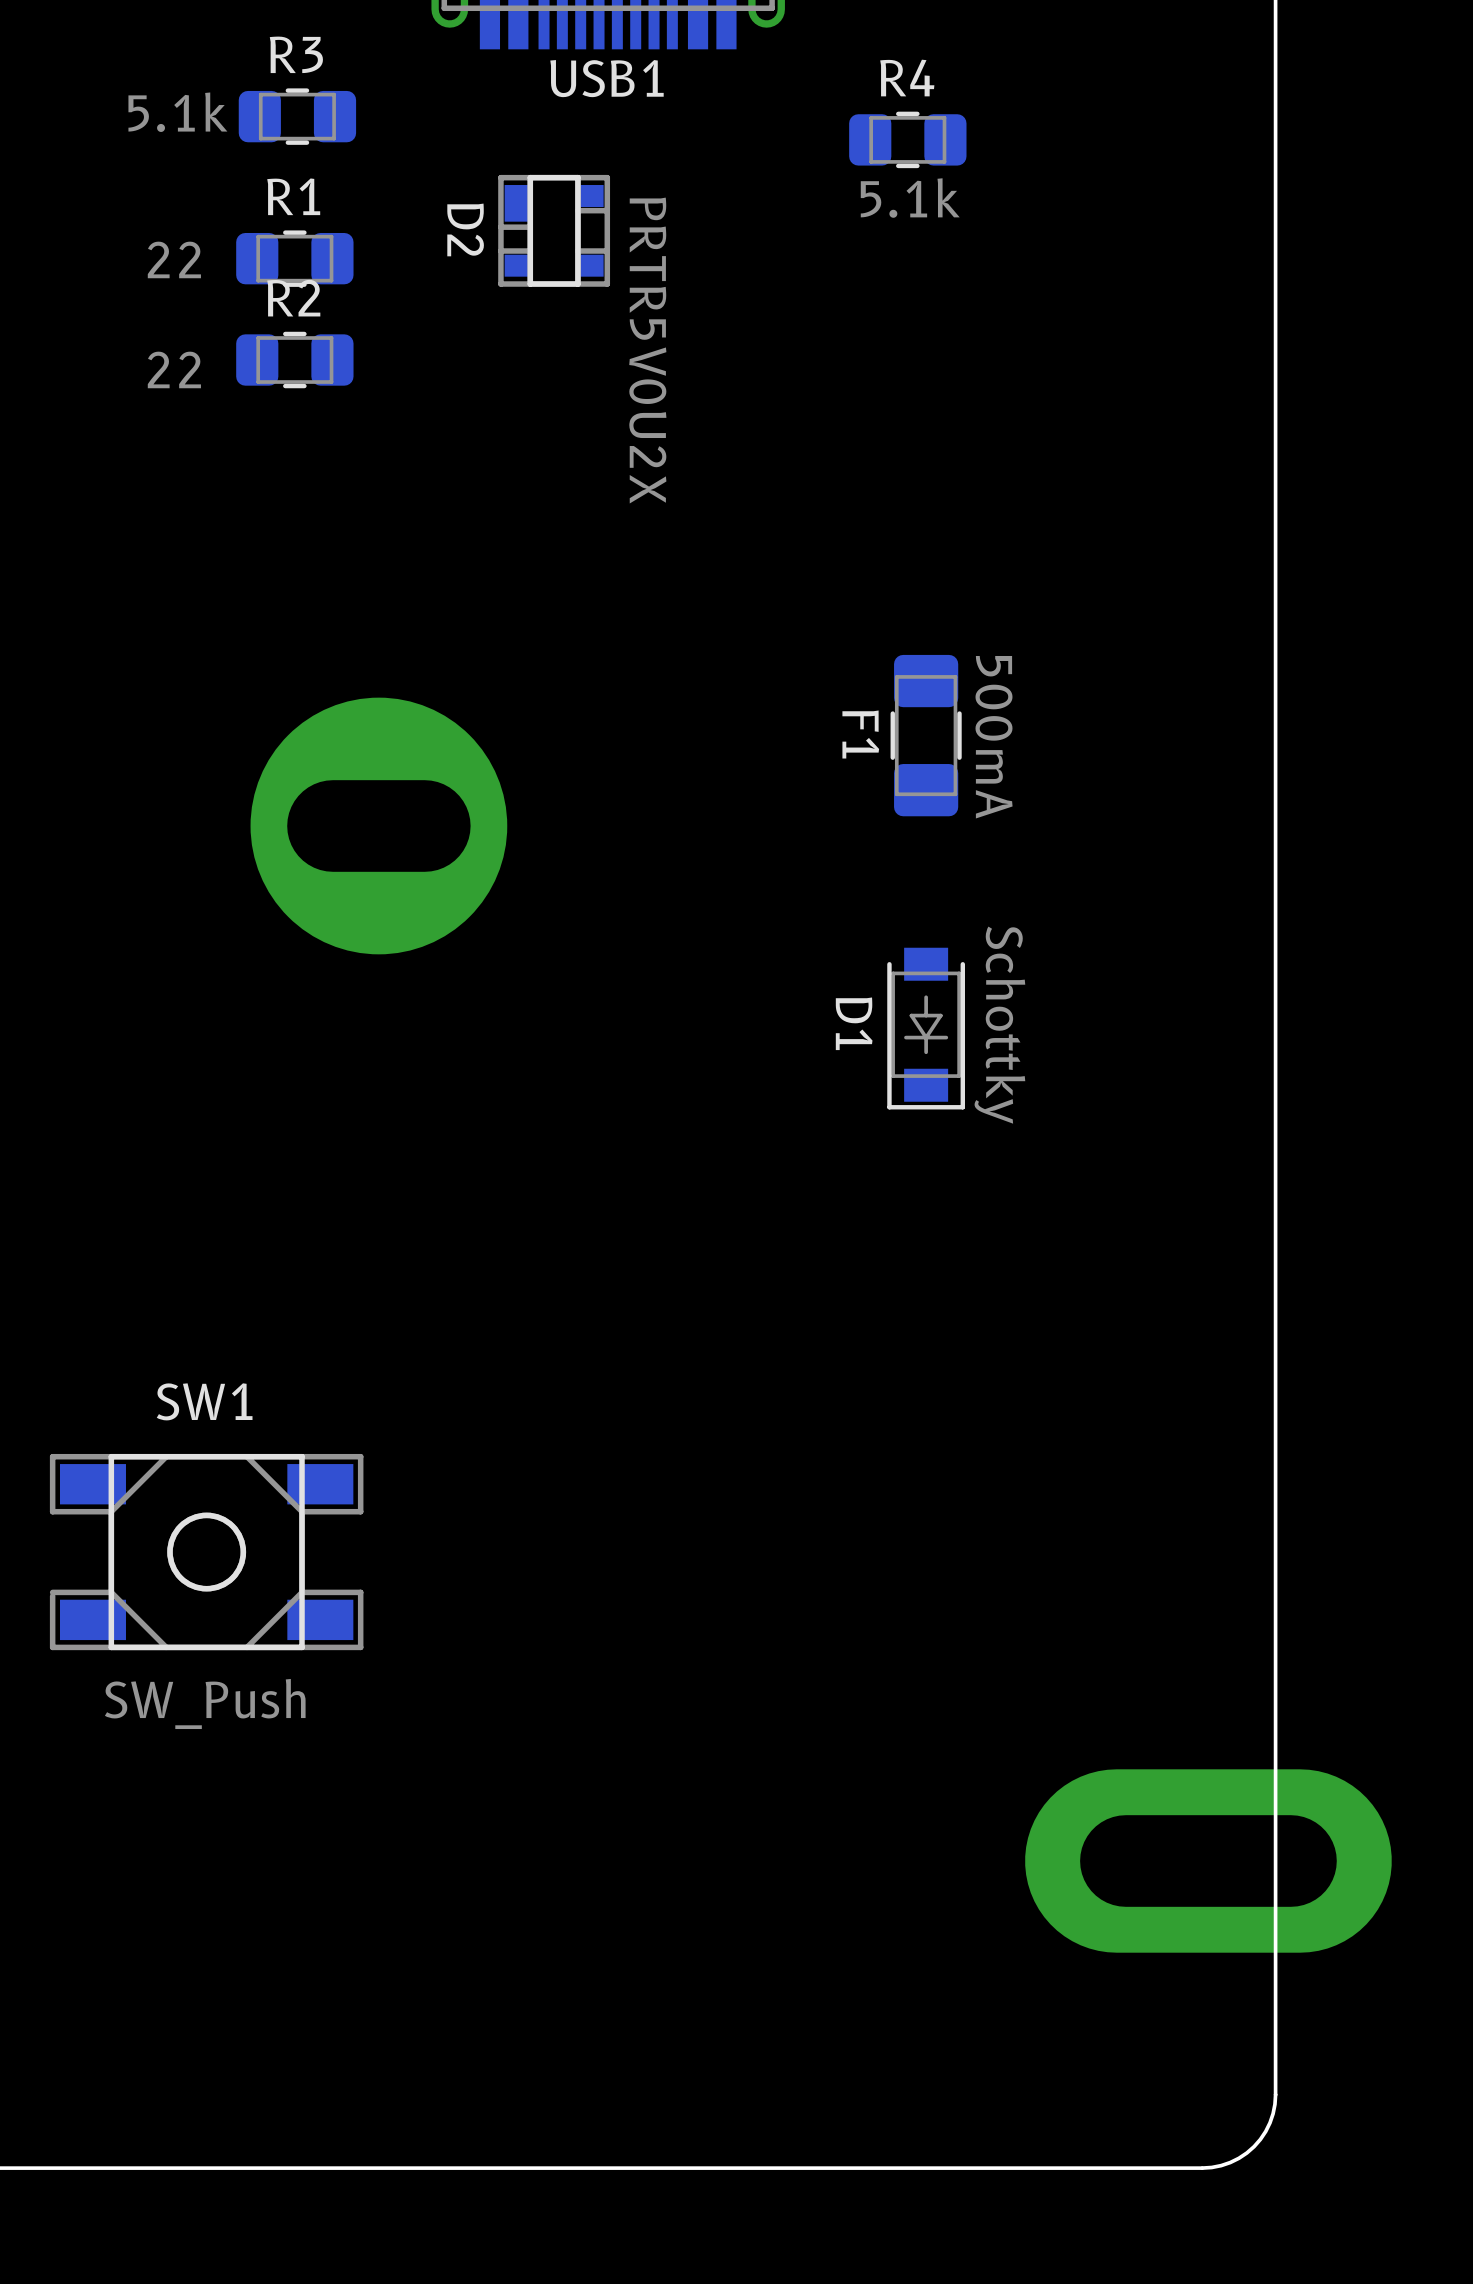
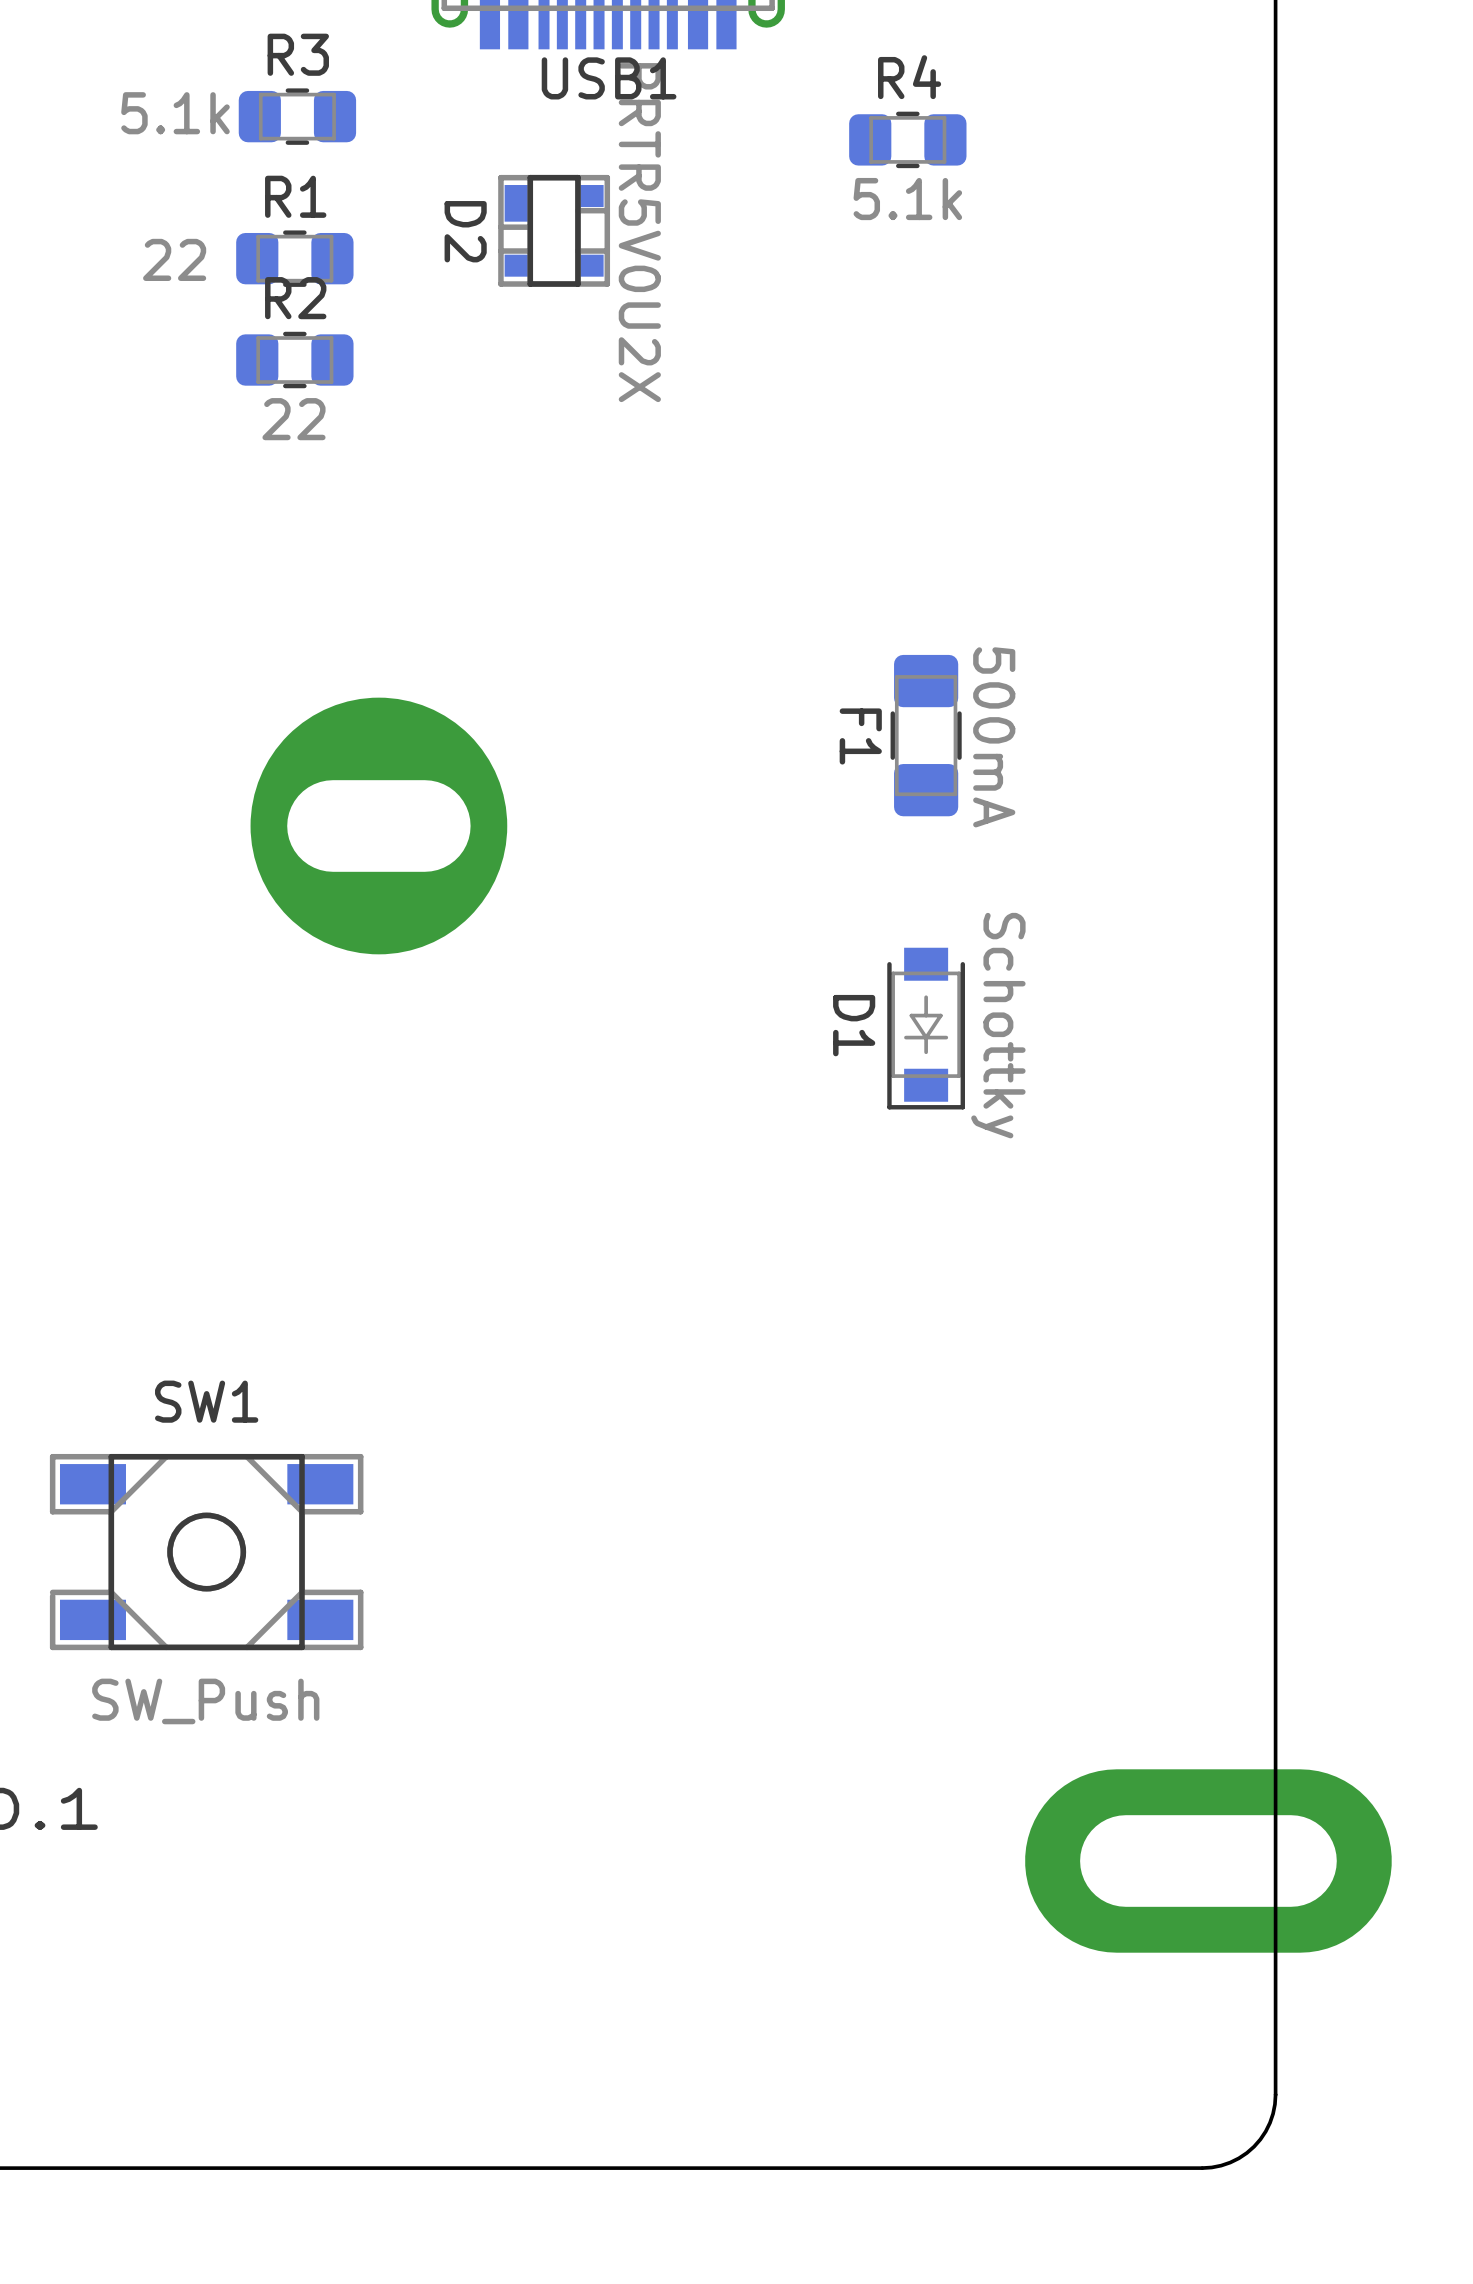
D2 value position: PRTR5V0U2X (647, 350) -> PRTR5V0U2X (639, 232)
R2 value position: 22 (174, 369) -> 22 (293, 419)

